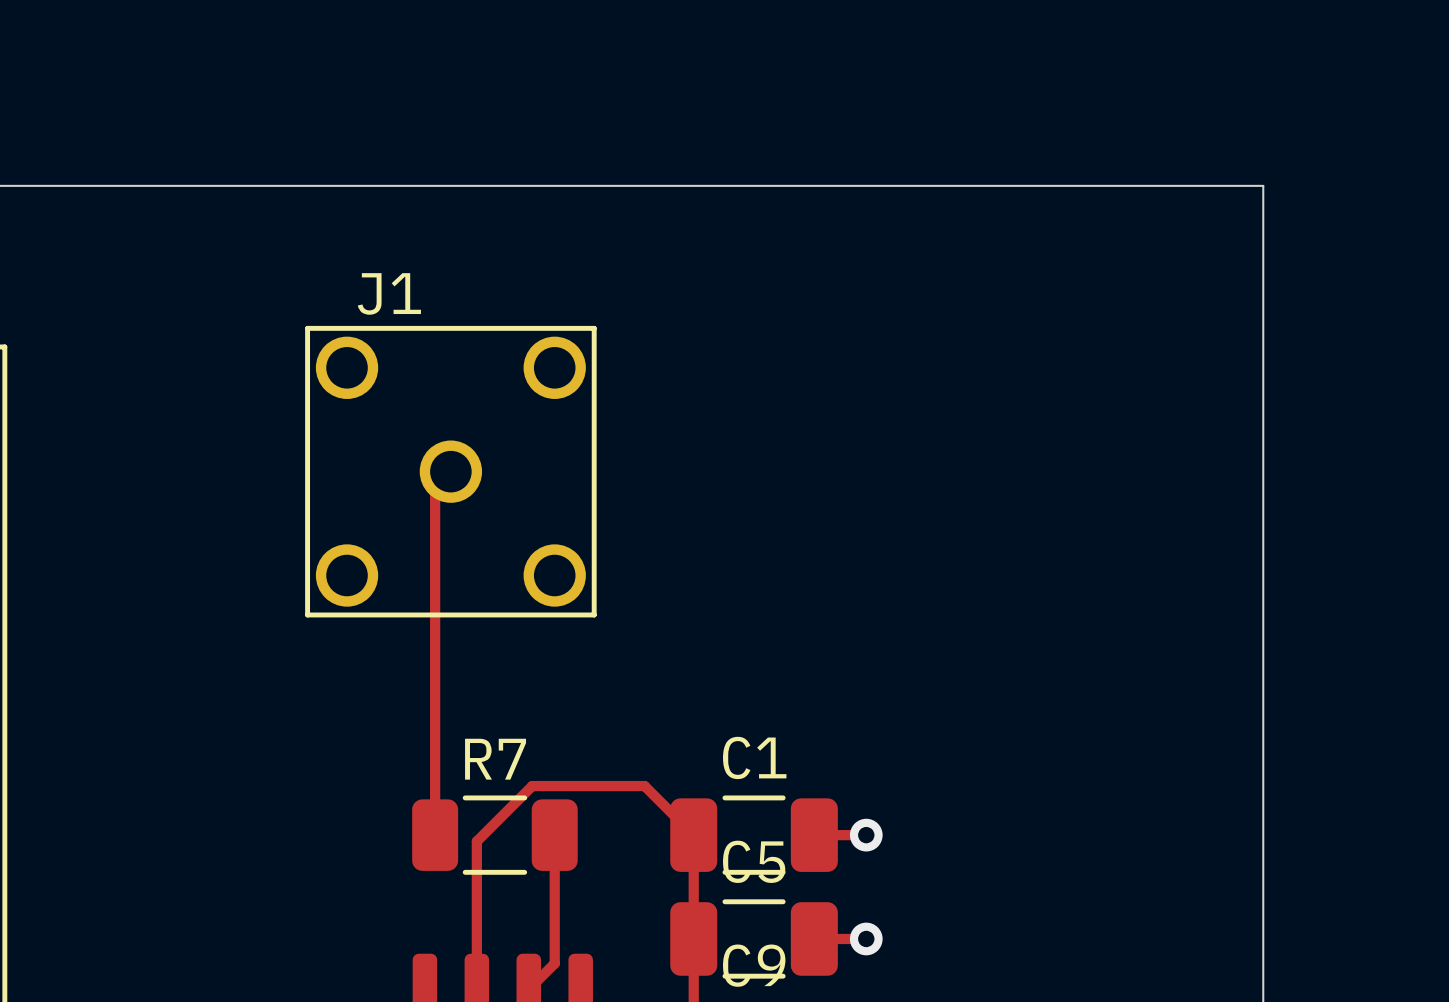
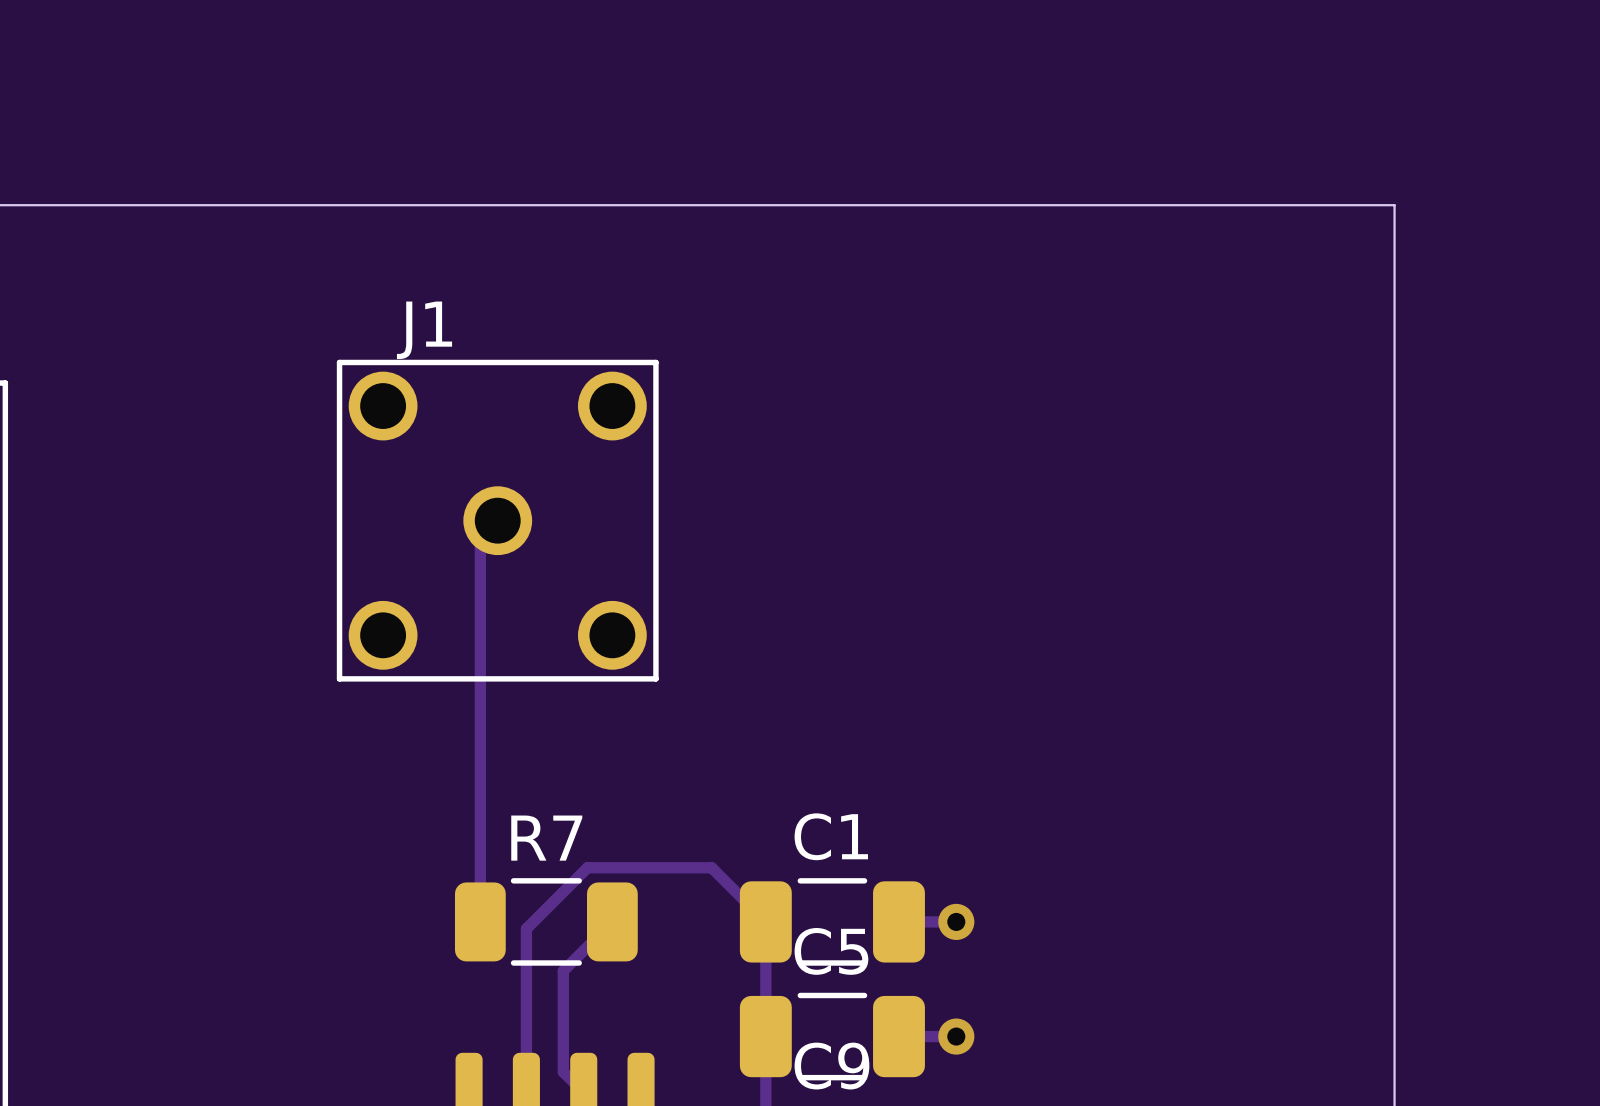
track: (554, 835) (554, 963) (528, 989) -> (612, 921) (563, 970) (563, 1071) (583, 1092)

